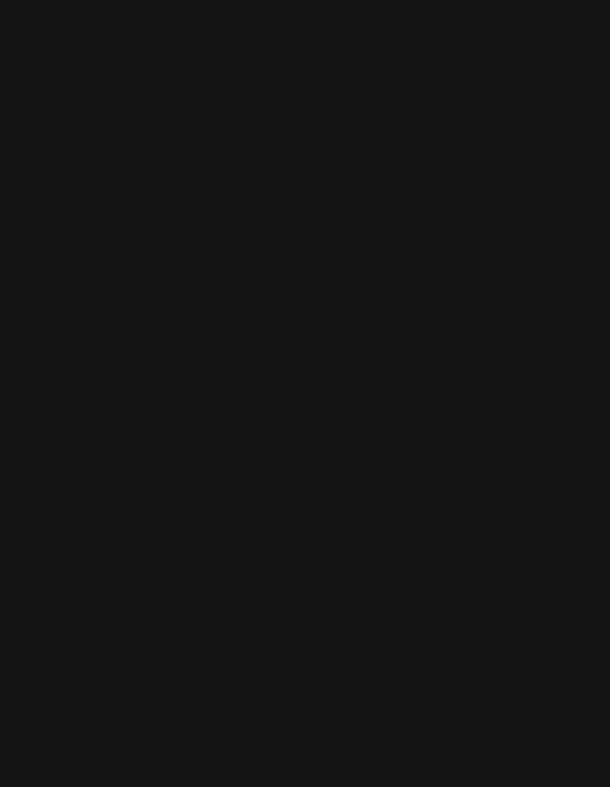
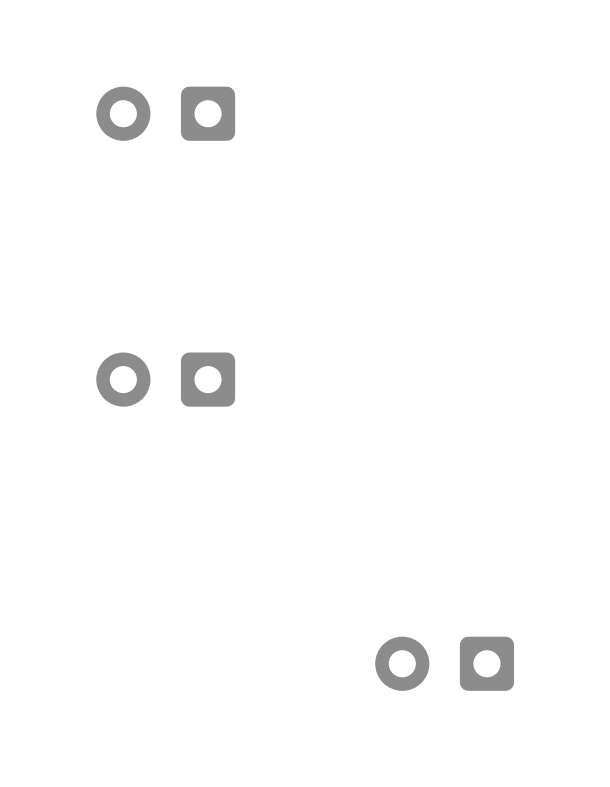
part: none -> (165, 113)
part: none -> (165, 379)
part: none -> (444, 663)

